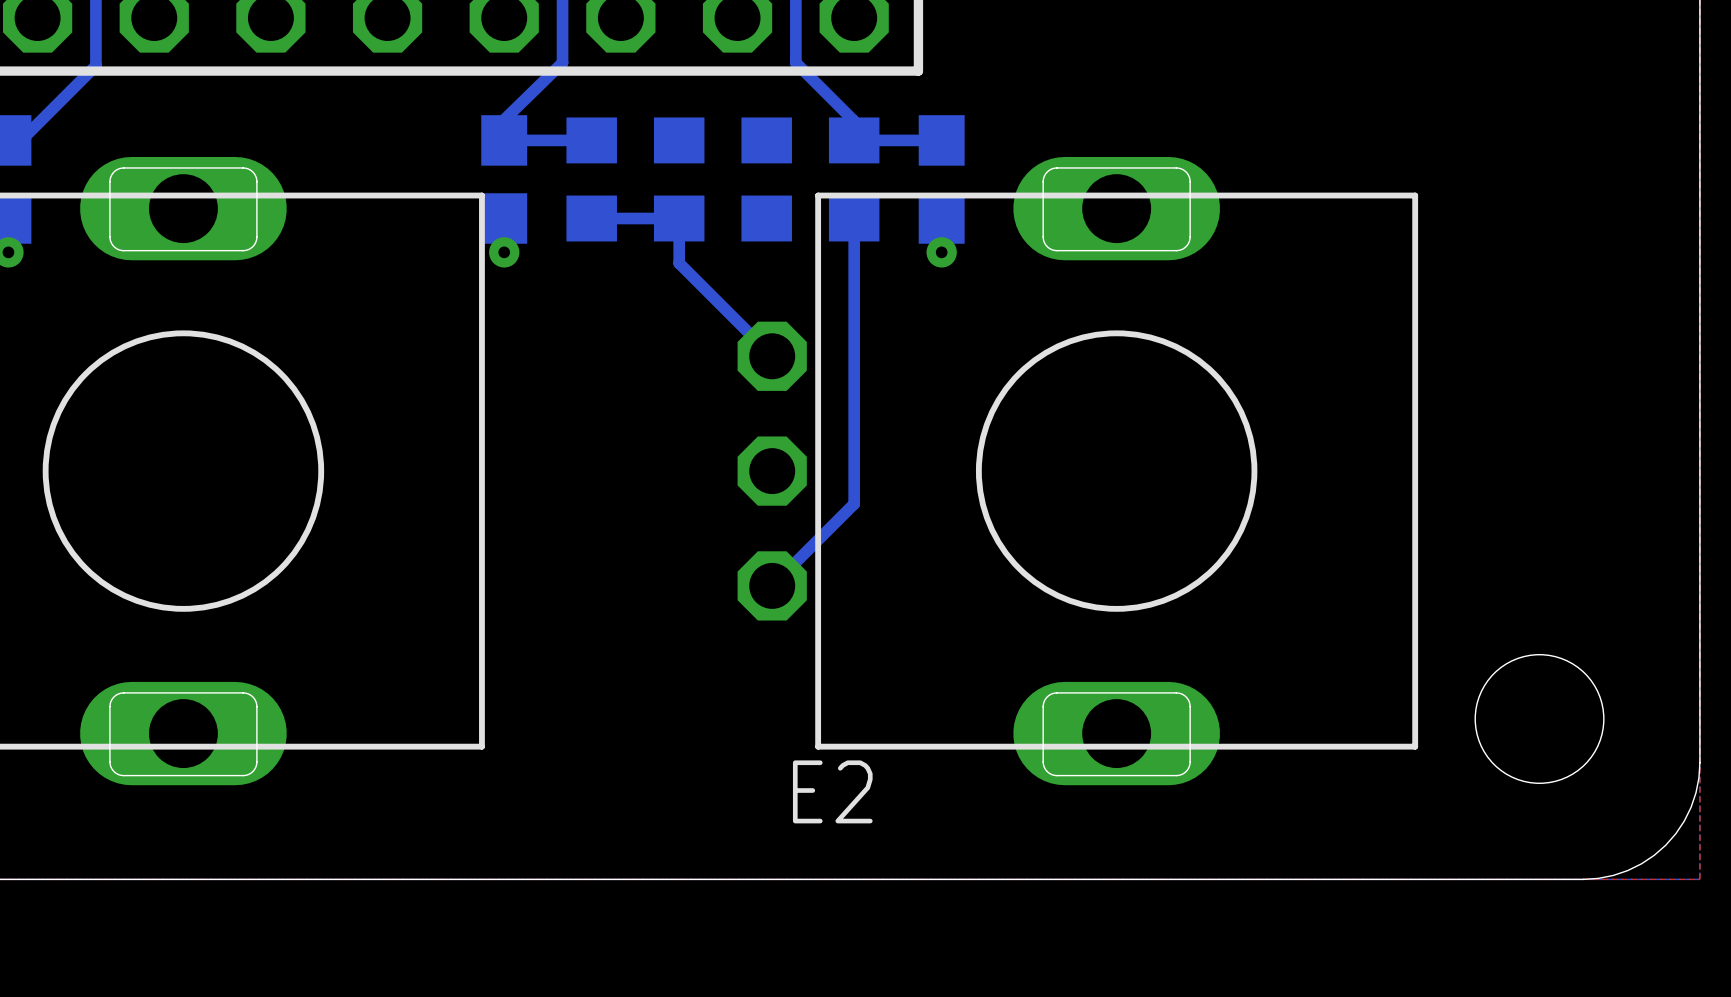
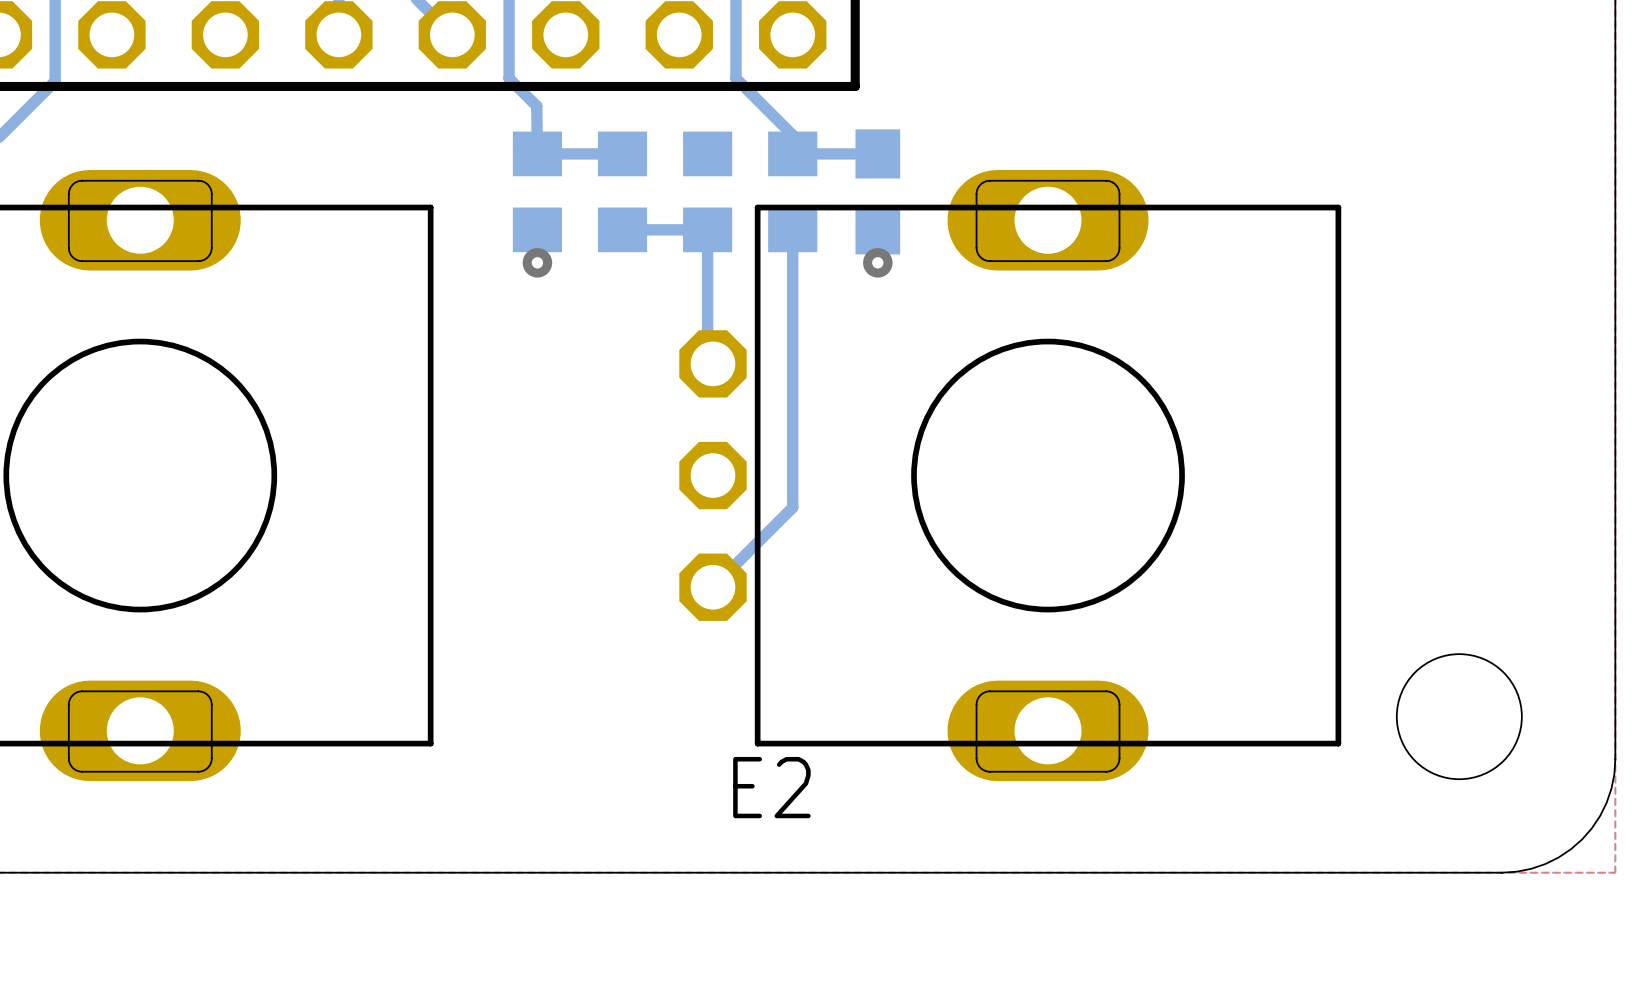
bottom track: (562, 62) (503, 120) (504, 140) (591, 140) -> (509, 78) (536, 106) (537, 153) (622, 153)
part: (504, 179) -> none
bottom track: (591, 218) (679, 218) (679, 263) (766, 350) -> (622, 229) (707, 229) (707, 358)
via position: (504, 252) -> (537, 262)

